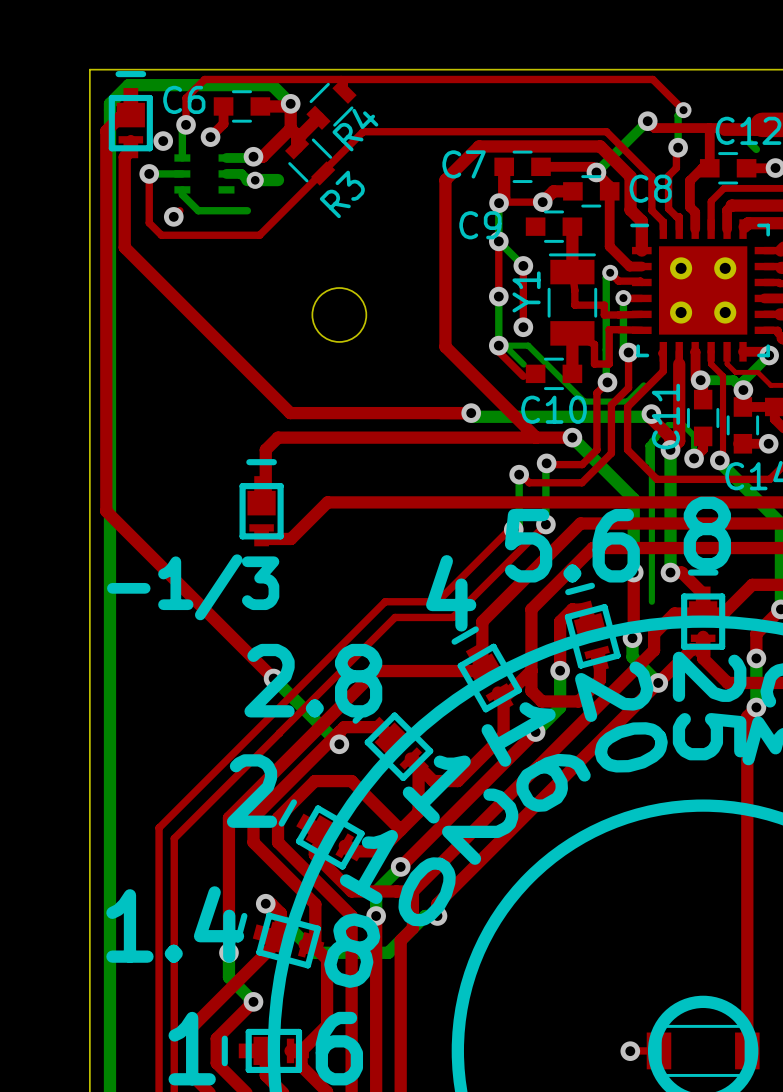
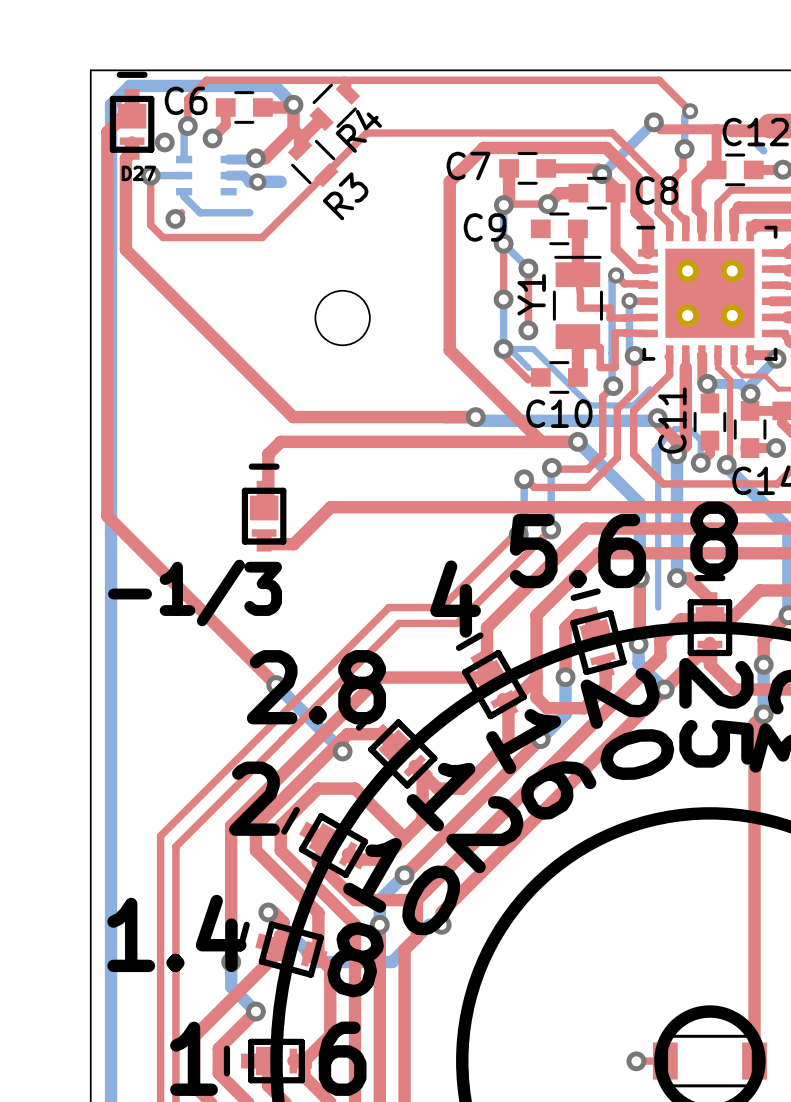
D27 name: none -> D27 (138, 173)

